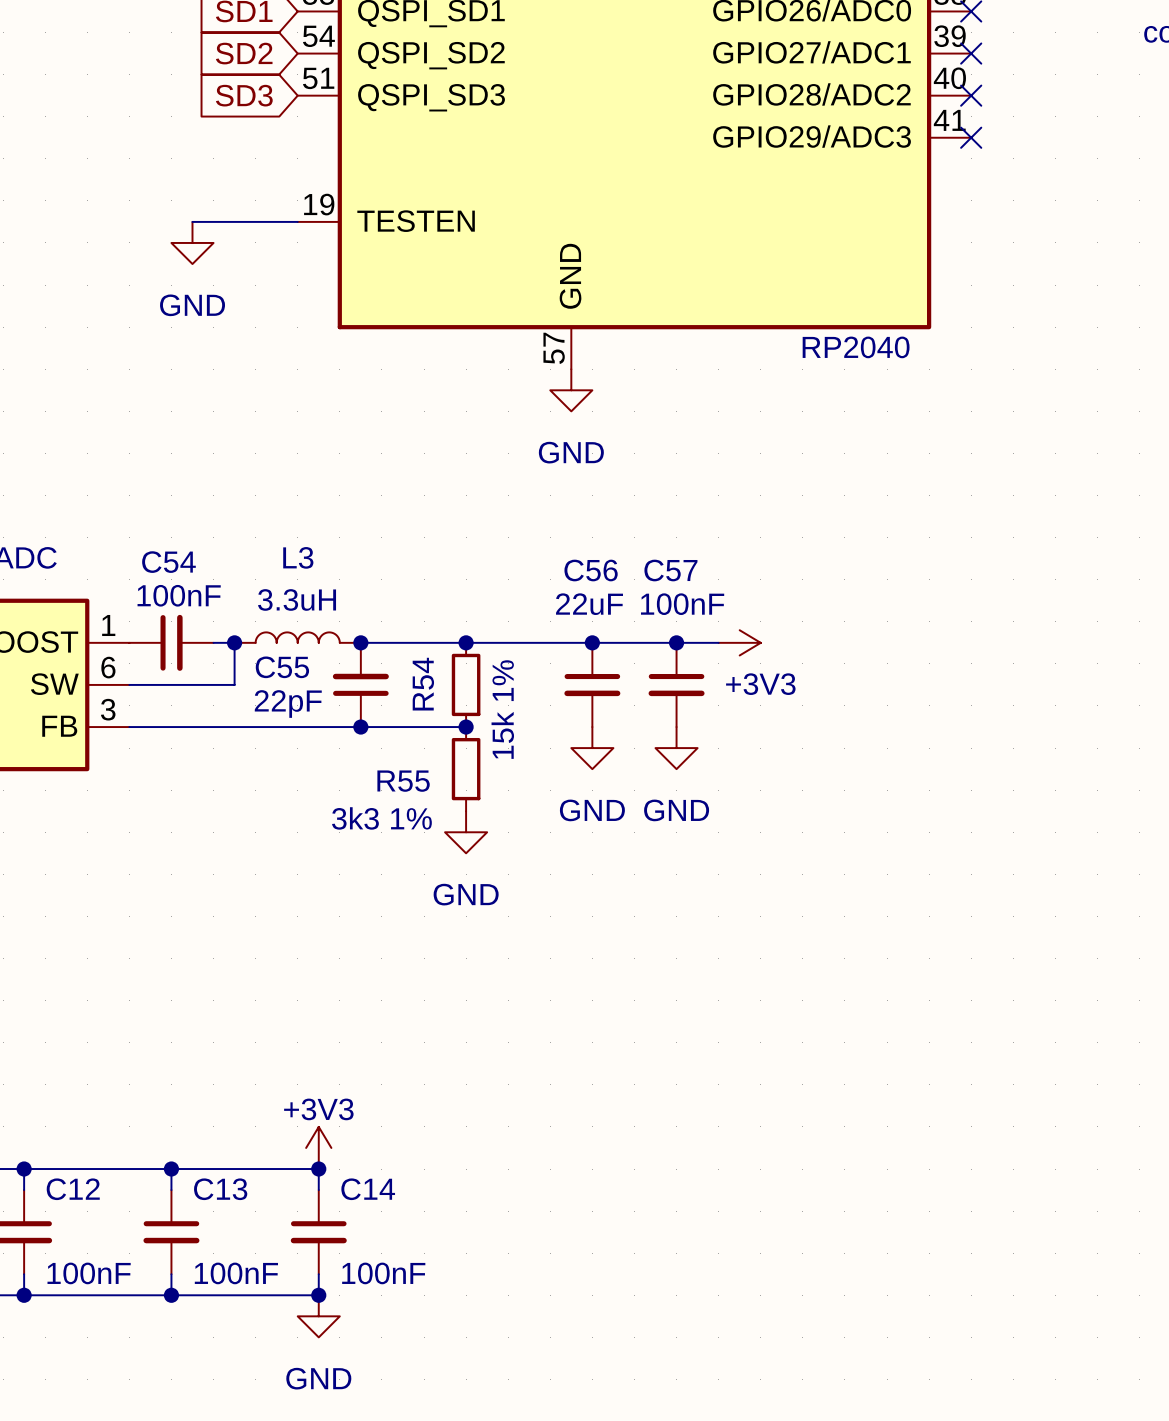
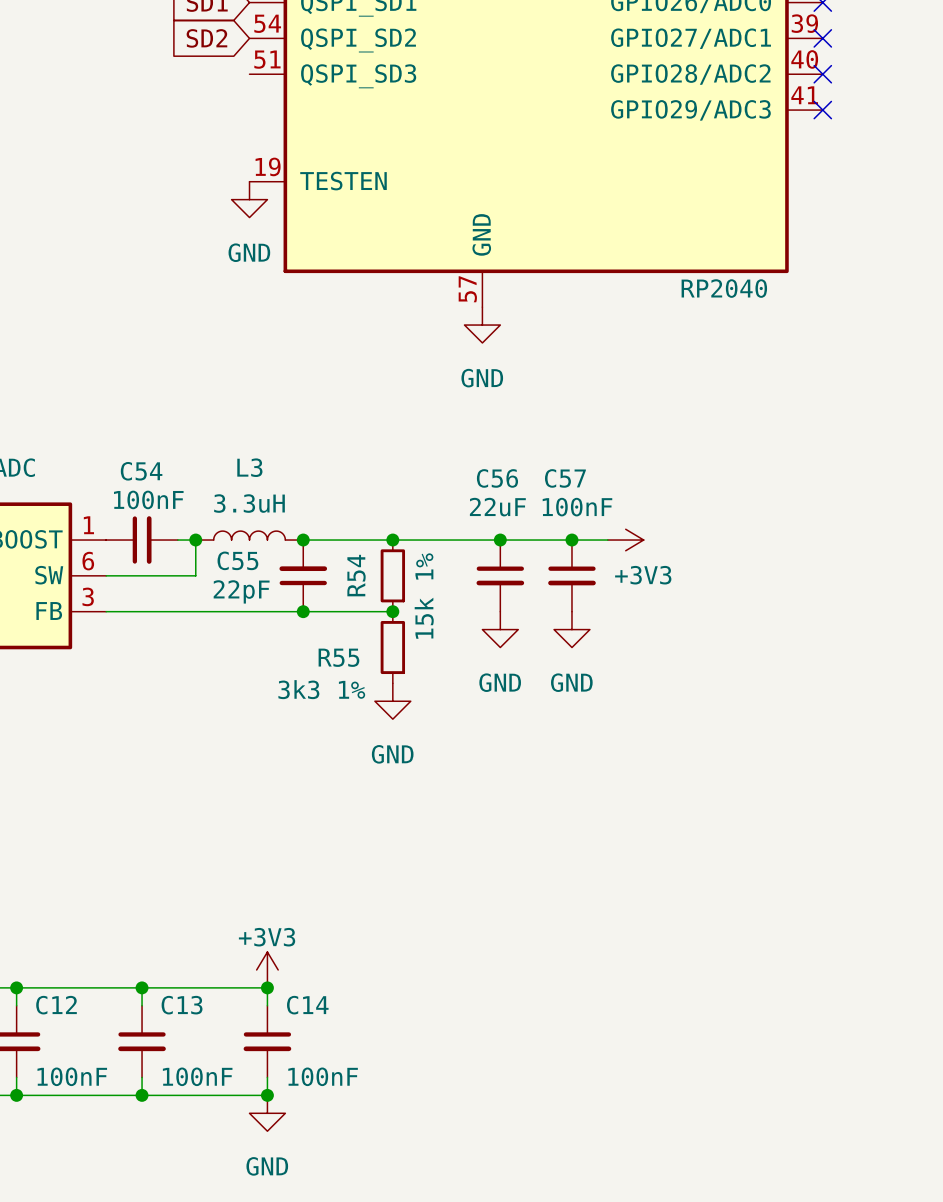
global label: SD3 (244, 95) -> none
wire: (192, 221) (297, 221) -> none
power symbol position: GND (192, 242) -> GND (249, 199)

